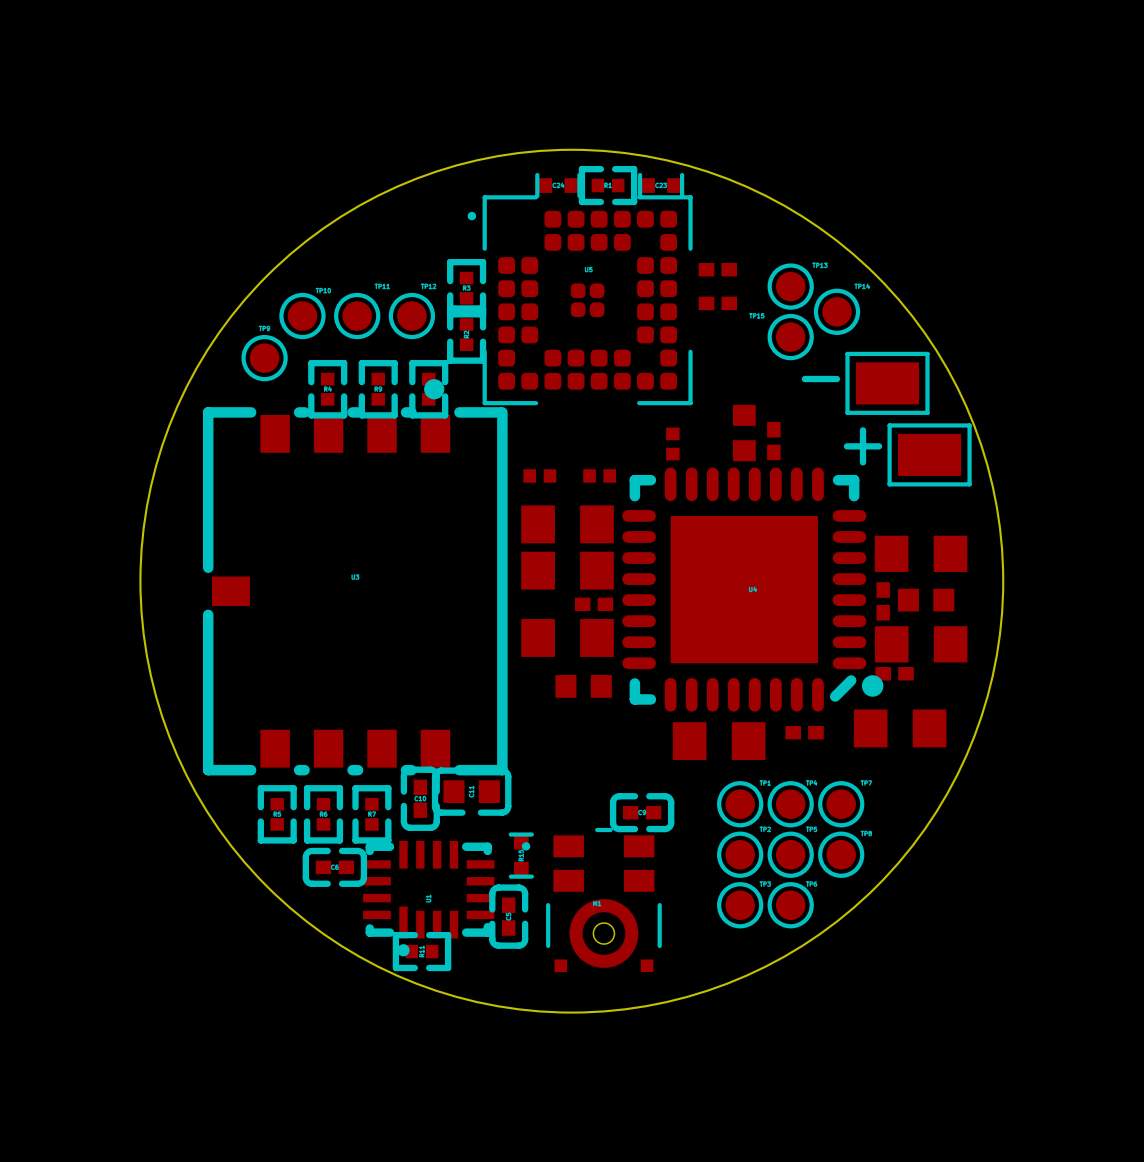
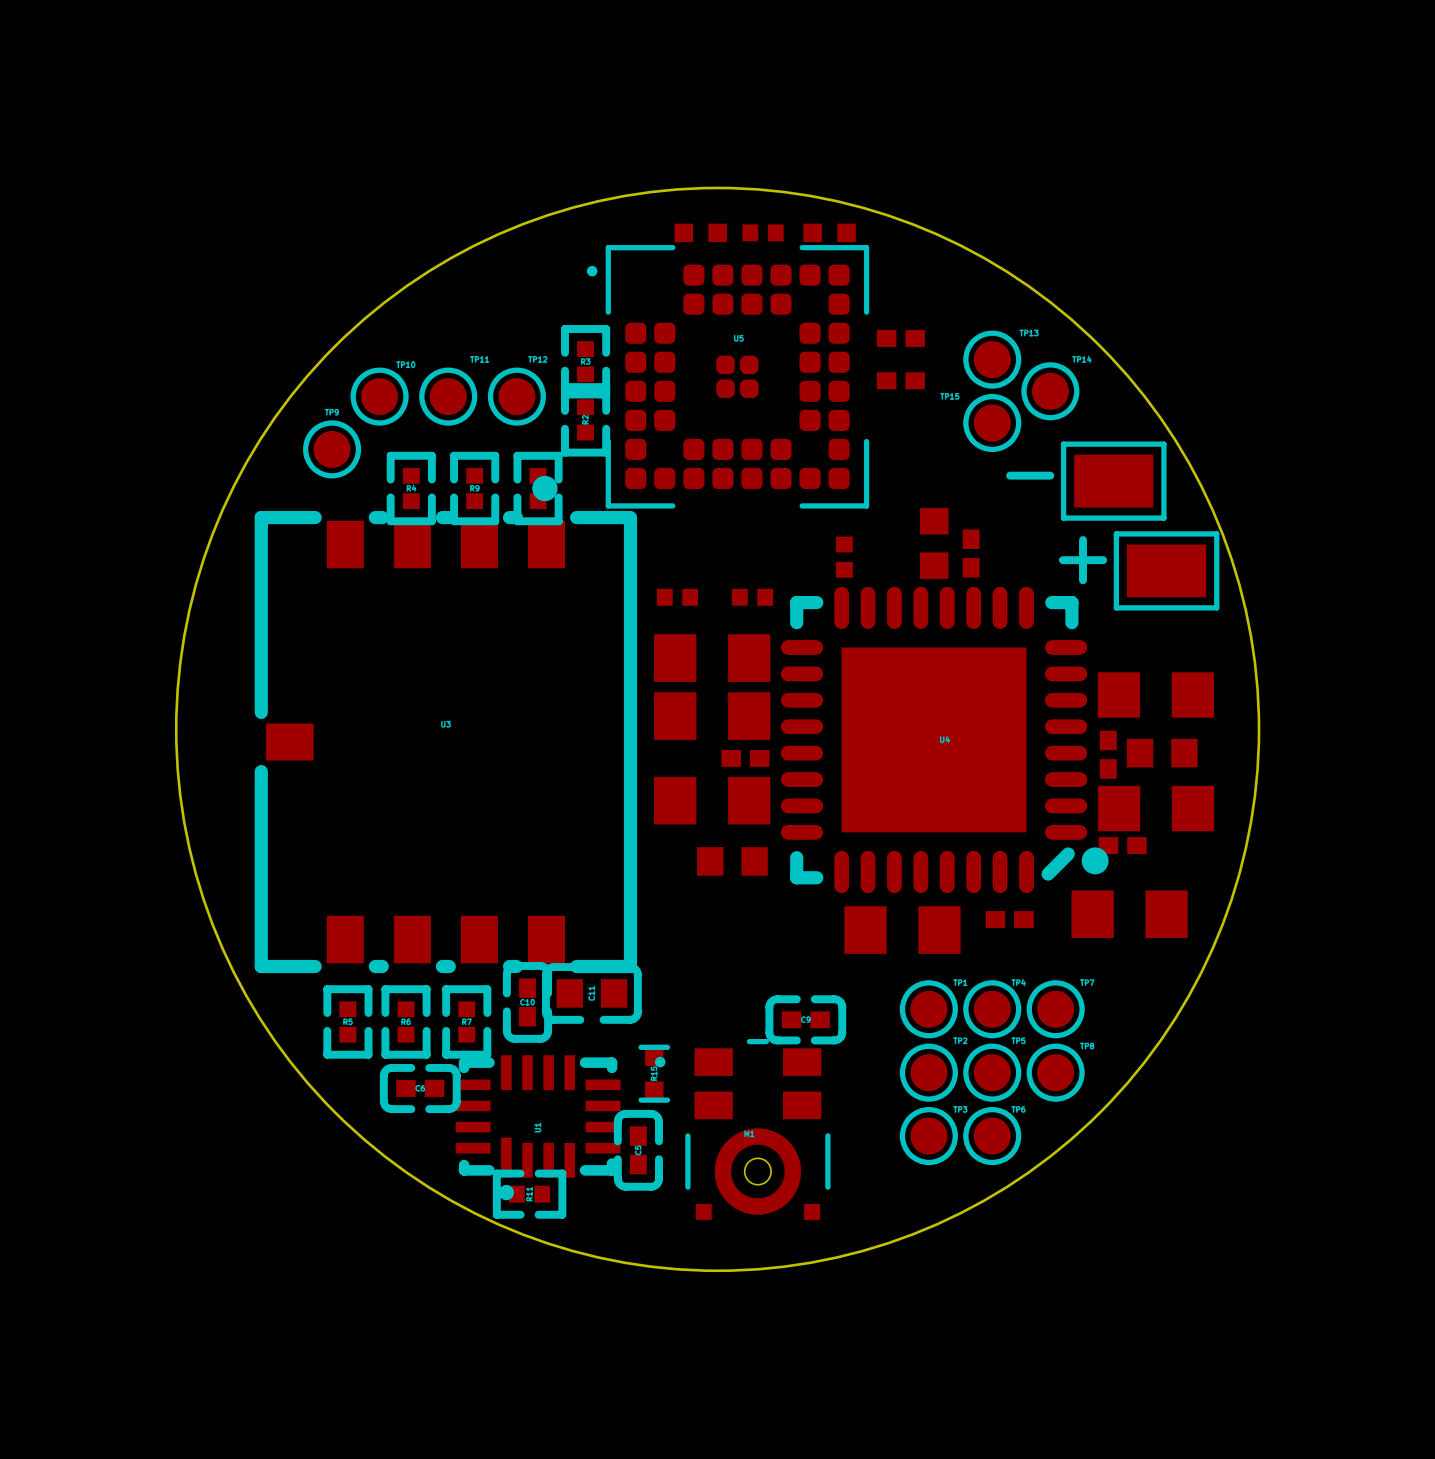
part: (558, 185) -> none
part: none -> (700, 232)
part: (608, 185) -> none
part: none -> (763, 232)
part: (661, 185) -> none
part: none -> (829, 232)

